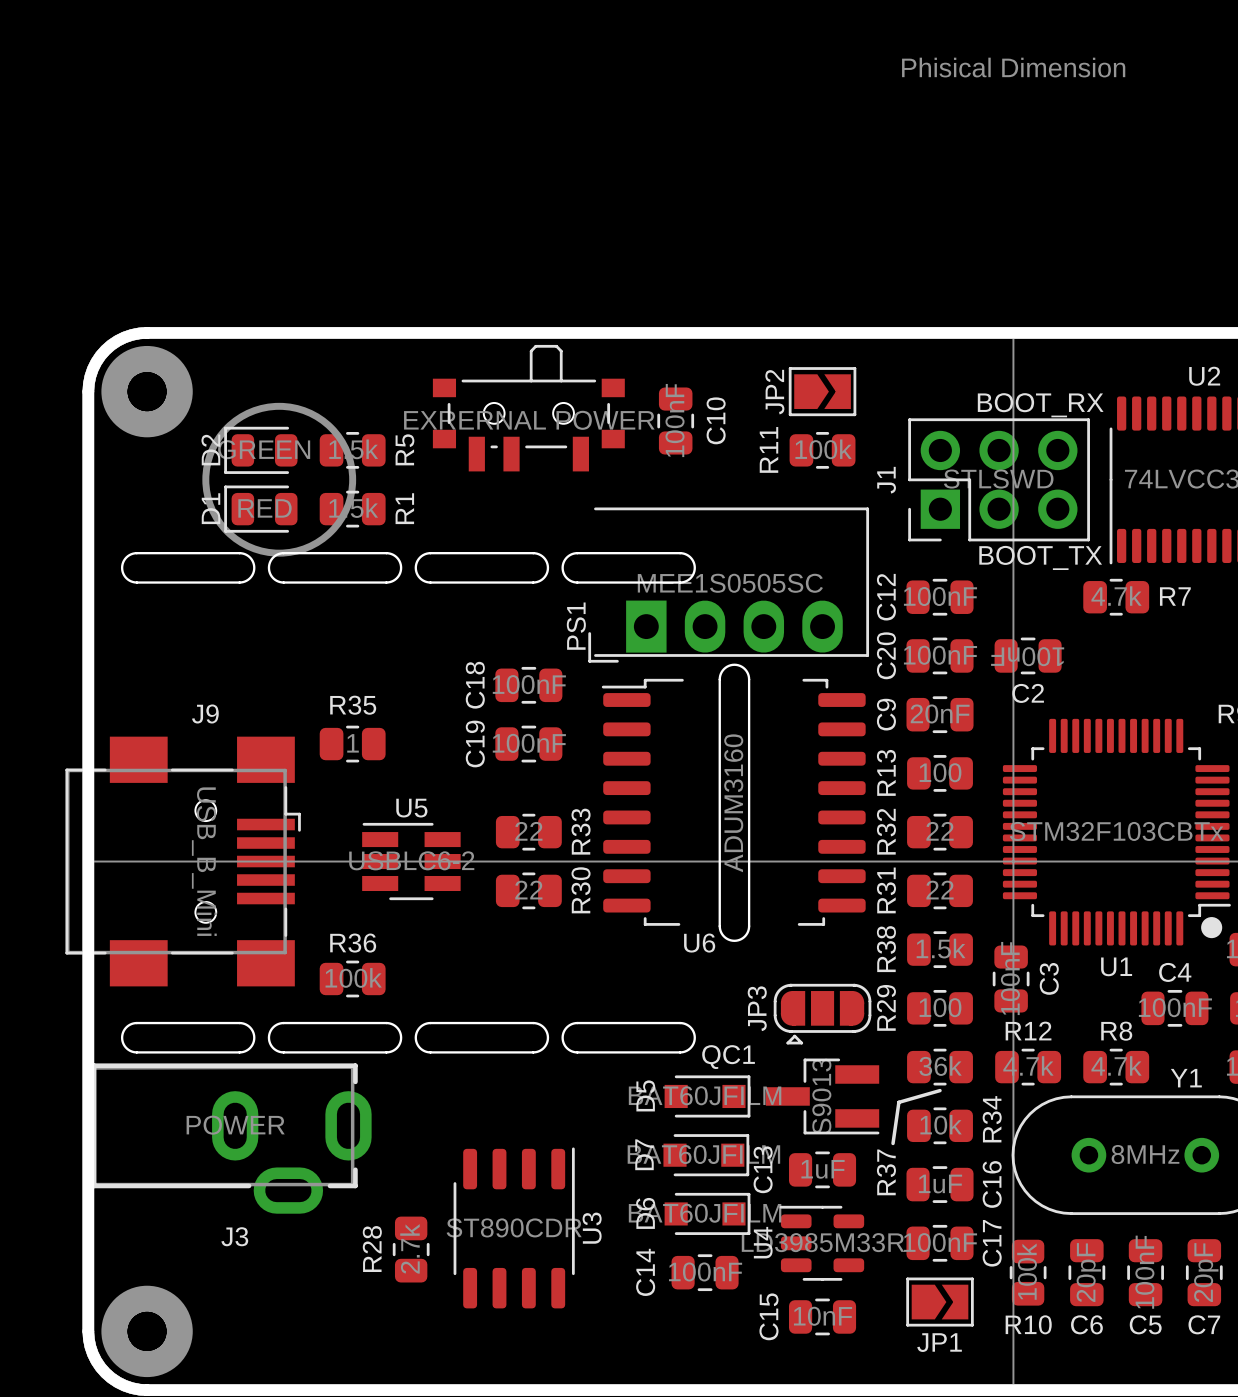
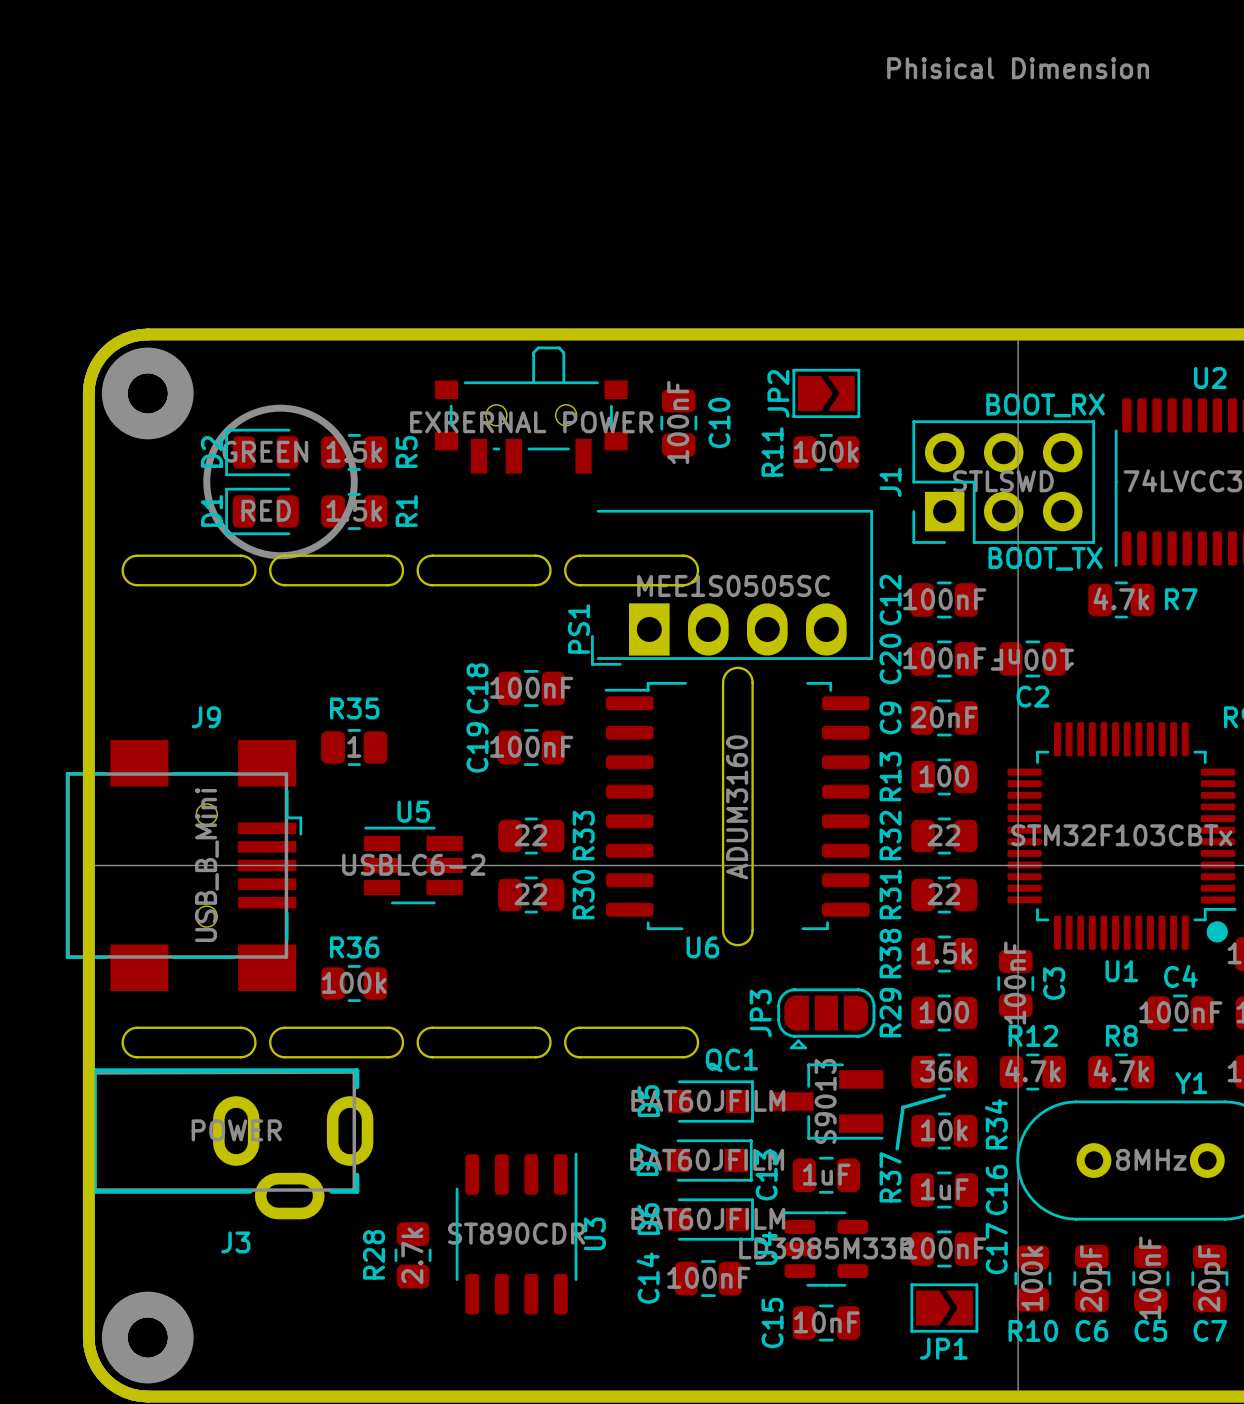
J9 value rotation: 0° (204, 861) -> 180° (206, 865)

